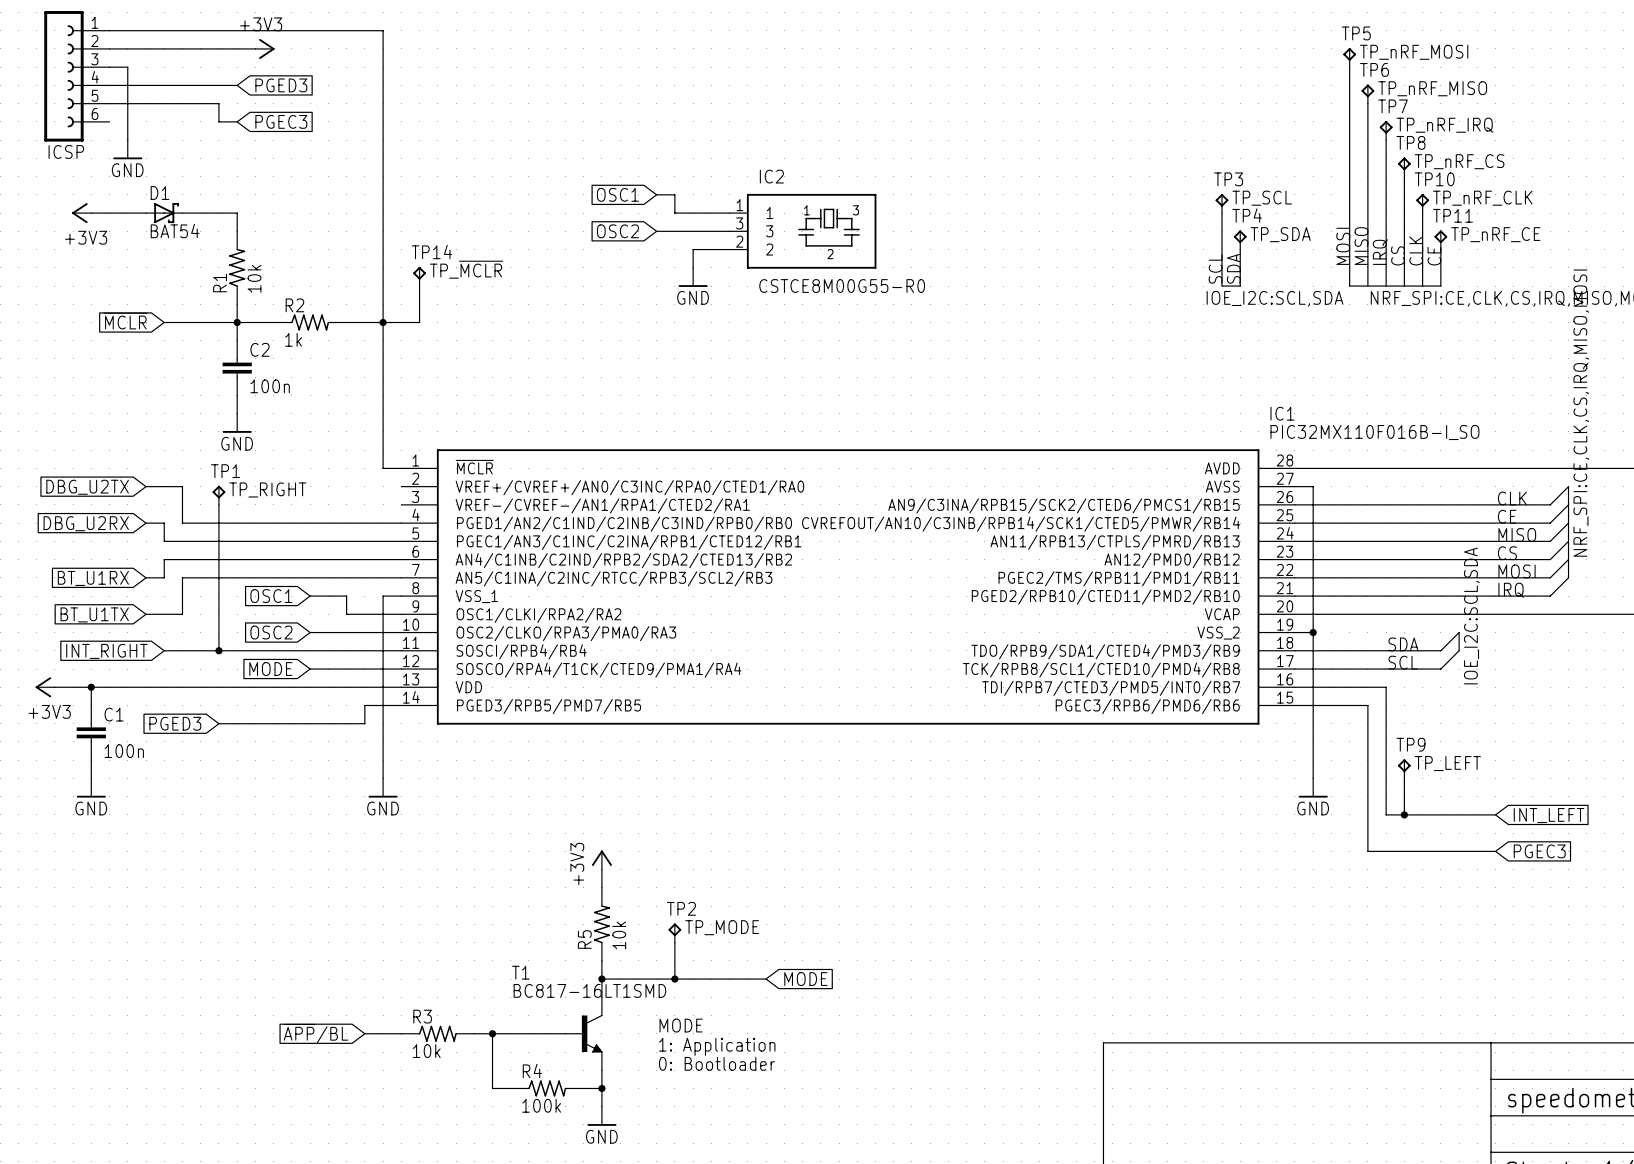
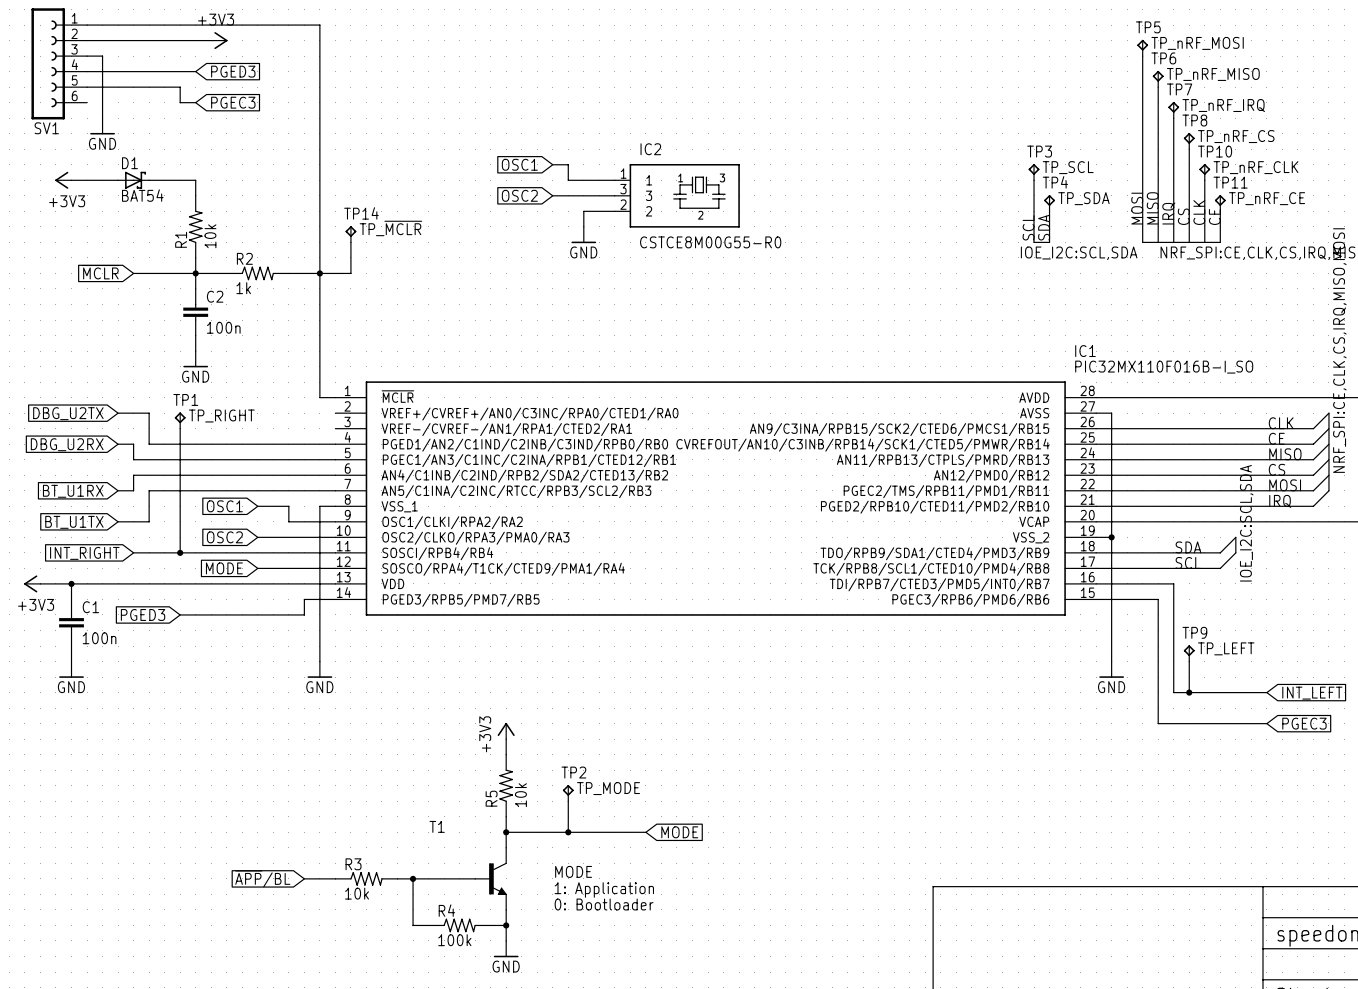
ICSP name: ICSP (66, 151) -> SV1 (46, 128)
T1 value: BC817-16LT1SMD (589, 990) -> none

